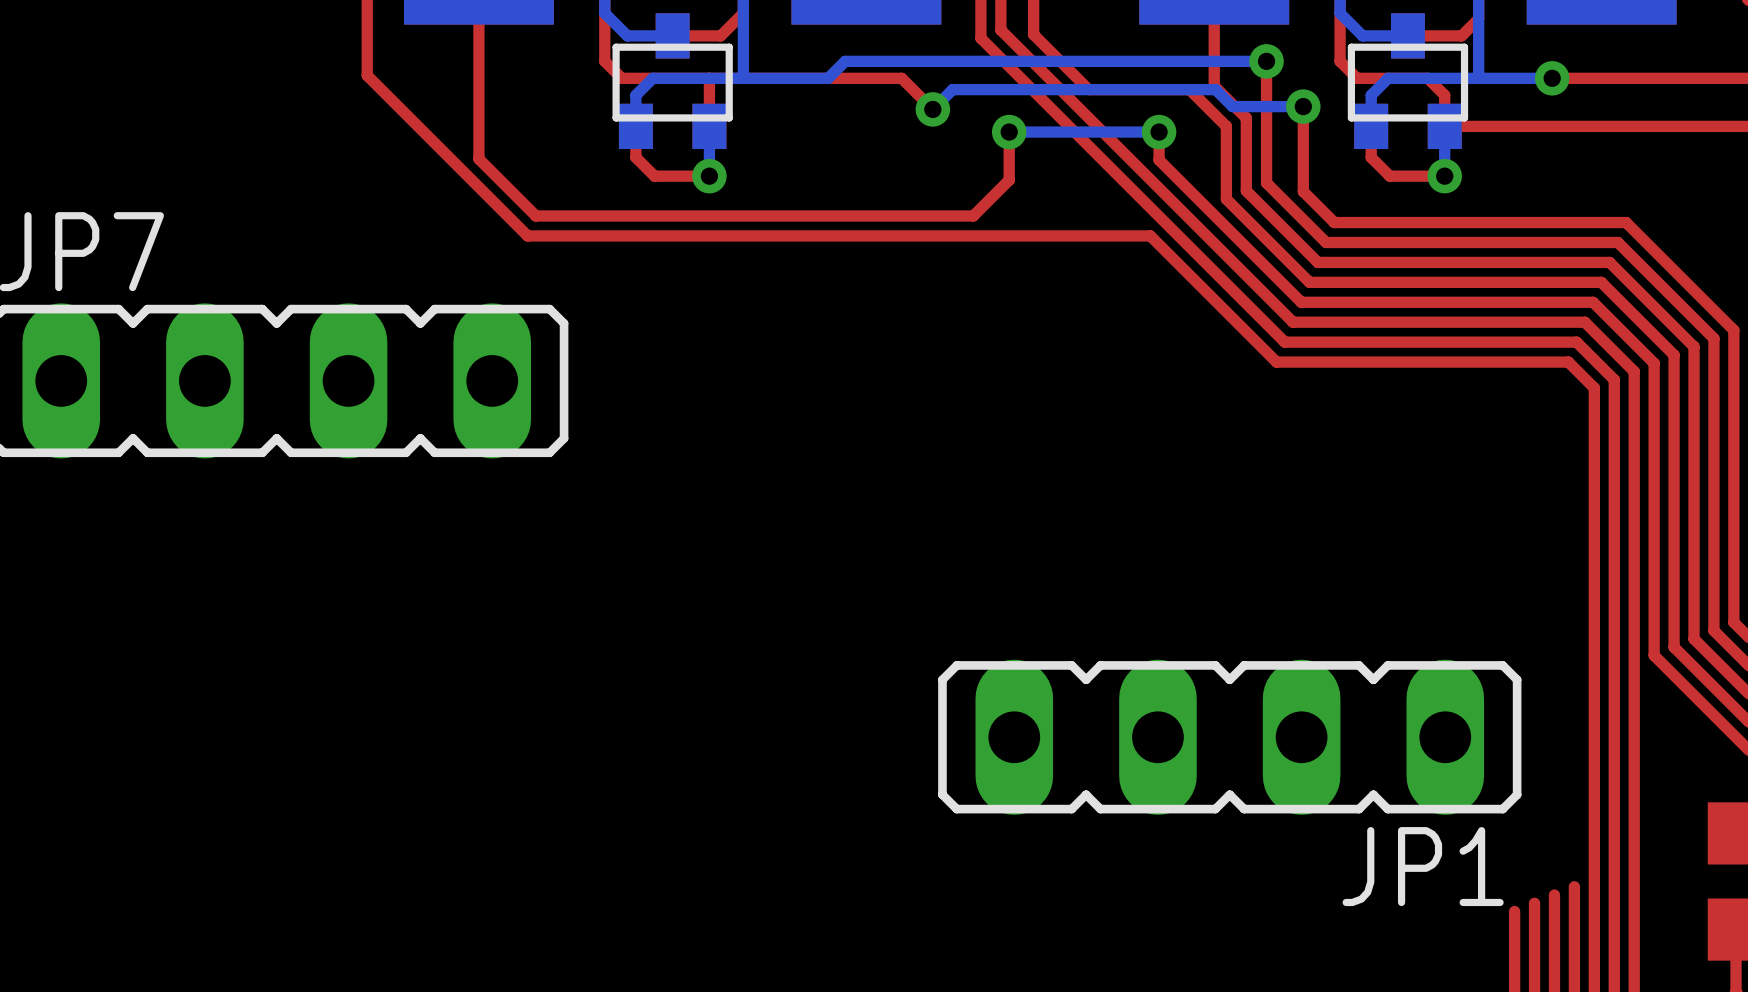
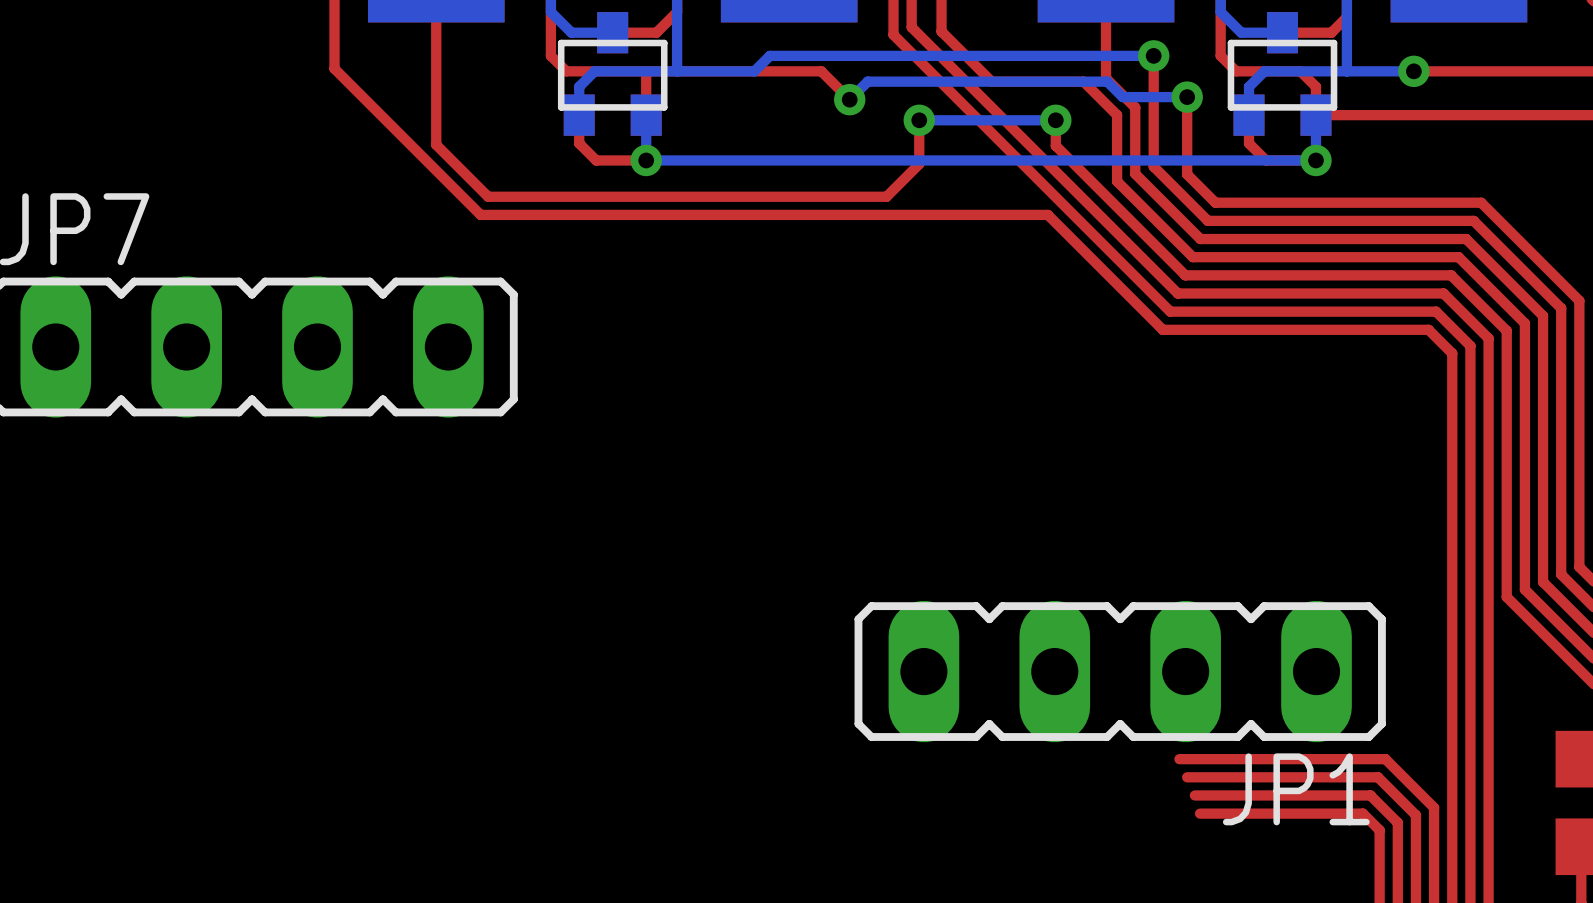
bottom track: none -> (1315, 160) (646, 160)
top track: none -> (1179, 759) (1385, 759) (1434, 807)
top track: none -> (1187, 777) (1378, 777) (1415, 815)
top track: none -> (1194, 795) (1370, 795) (1397, 822)
top track: none -> (1200, 813) (1362, 813) (1379, 830)

